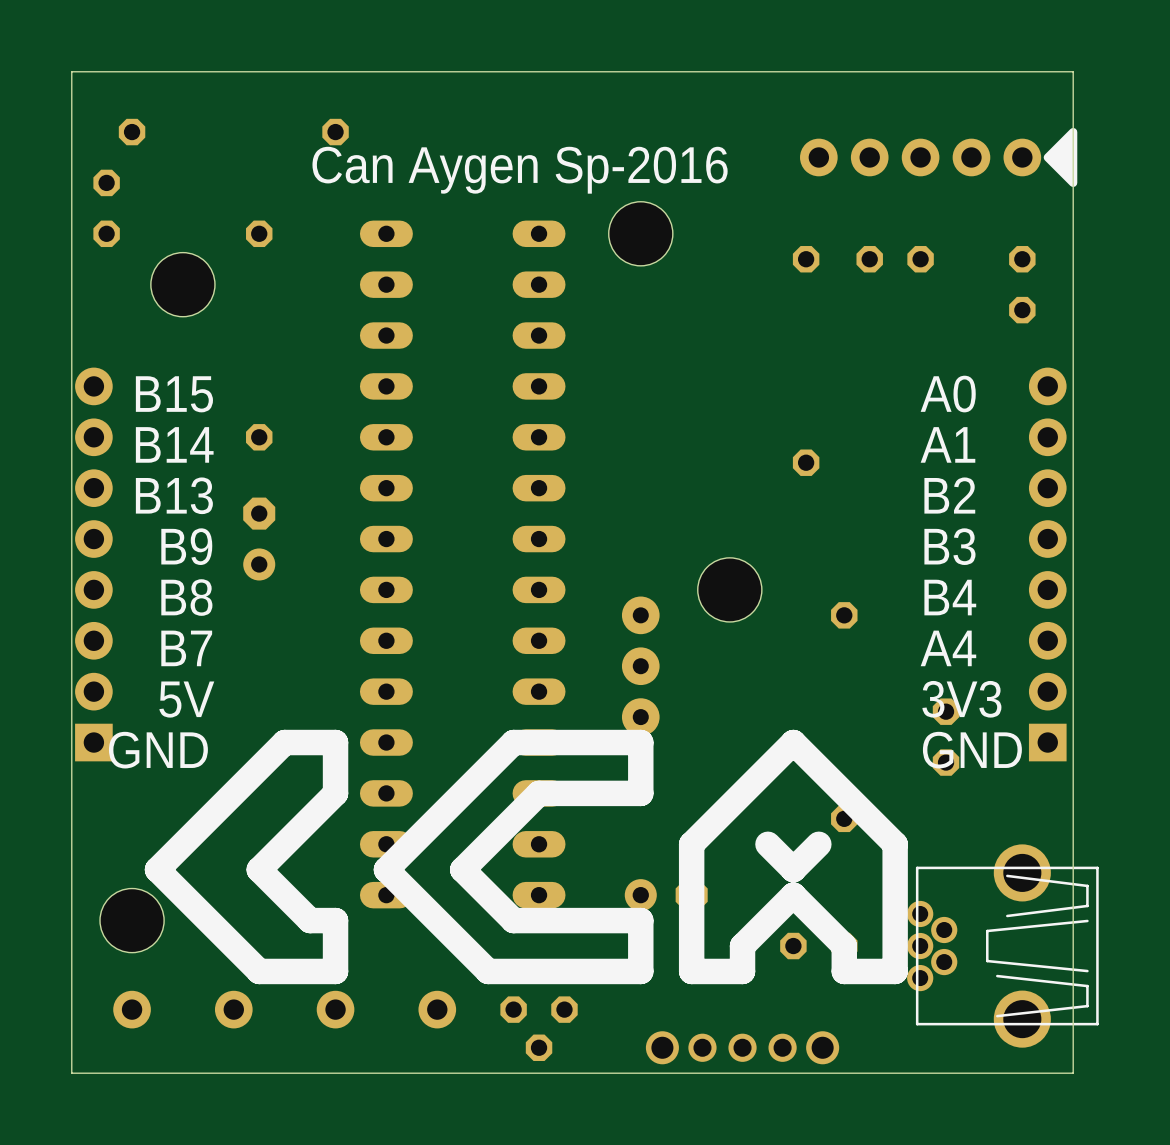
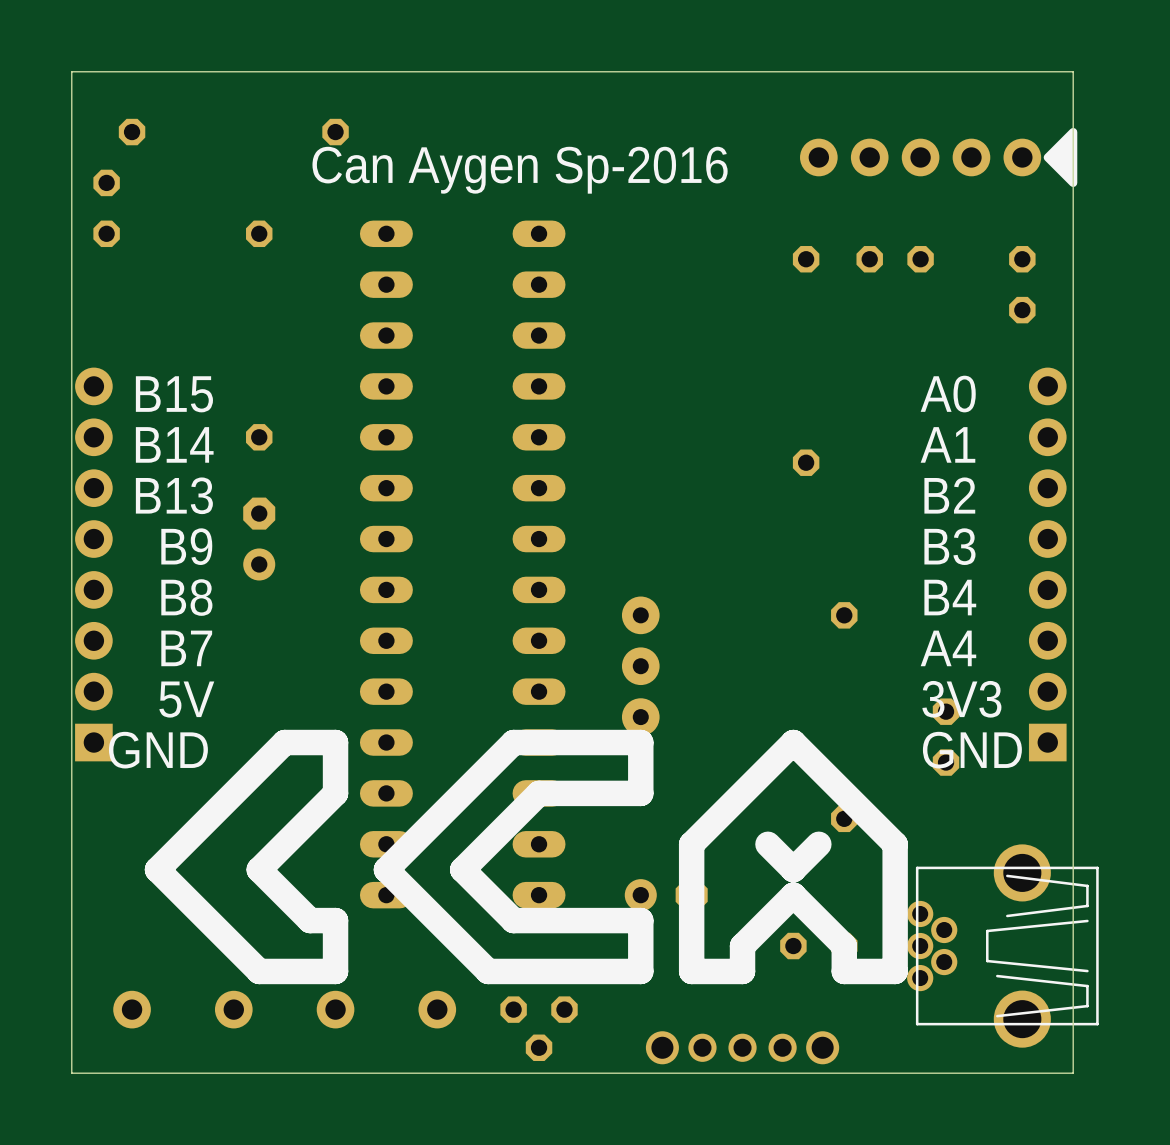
hole: (640, 233) -> none
hole: (182, 284) -> none
hole: (729, 589) -> none
hole: (132, 920) -> none

